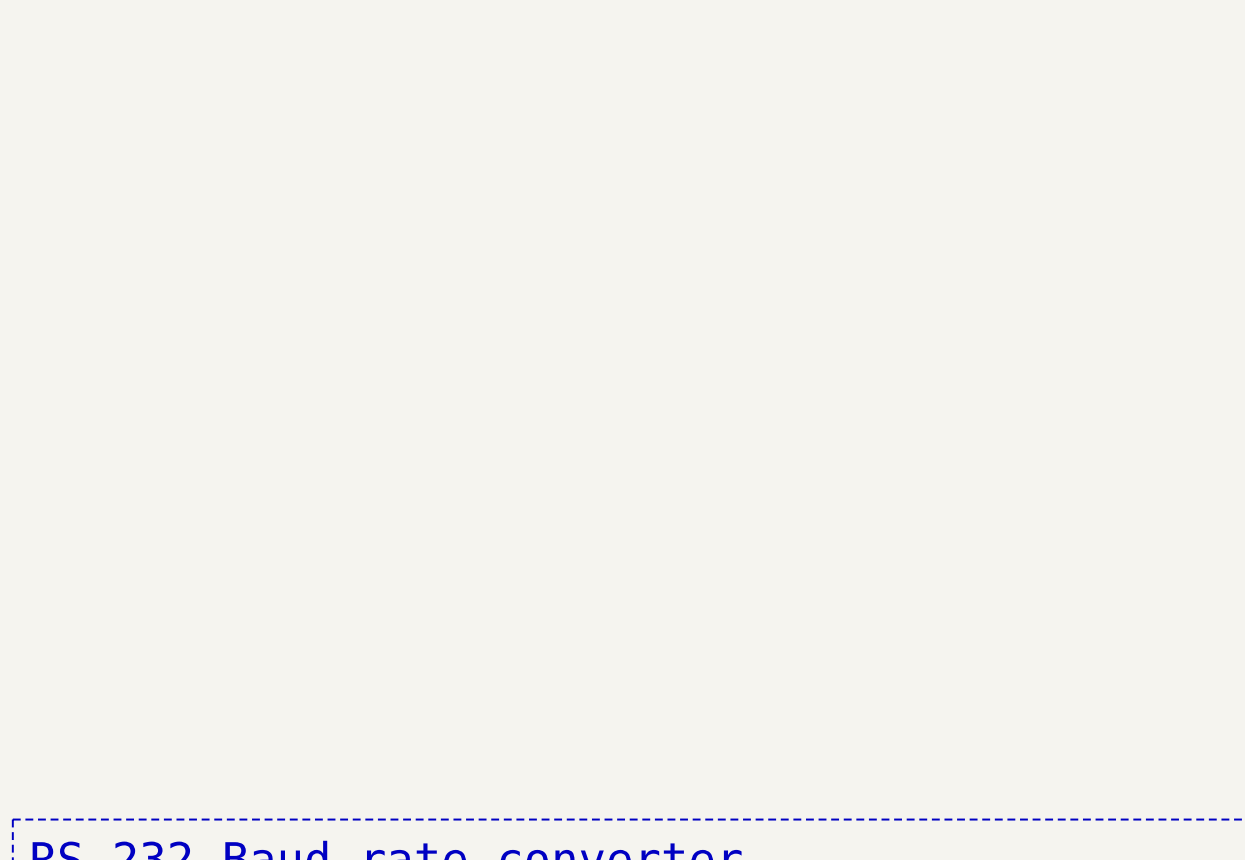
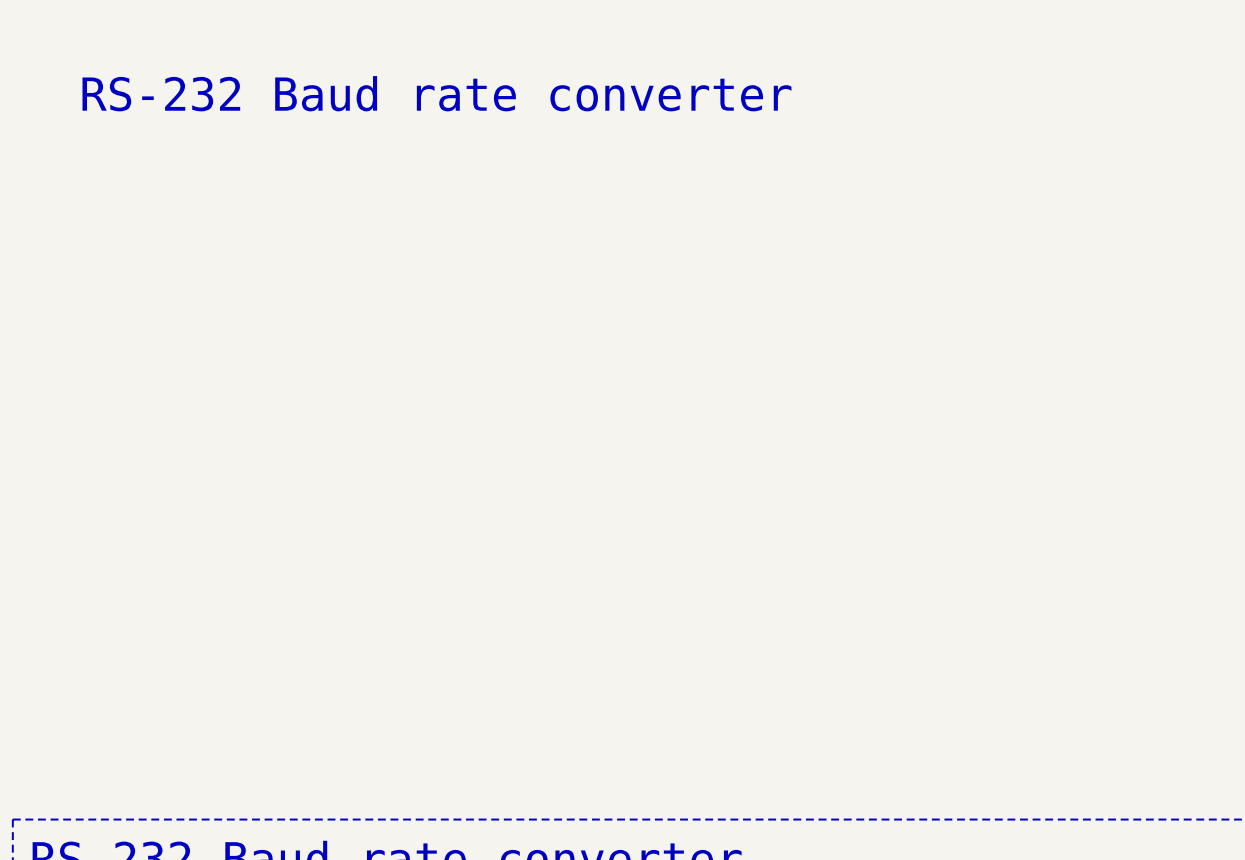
text: none -> RS-232 Baud rate converter (436, 93)

